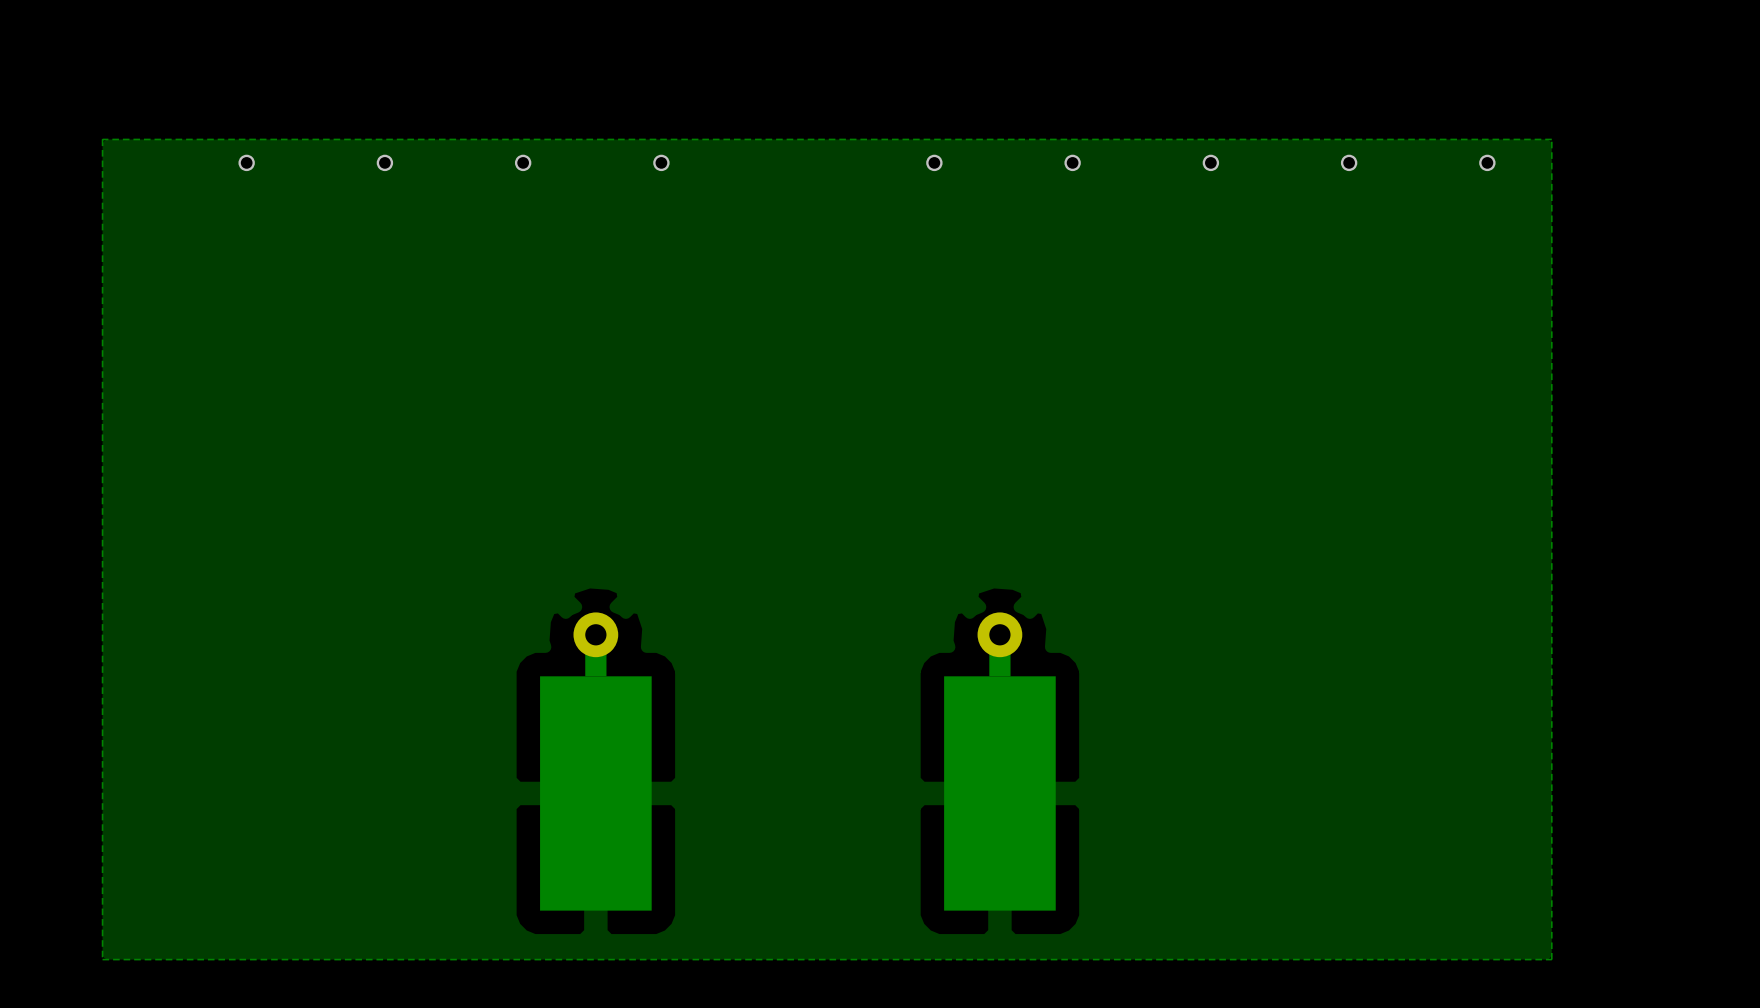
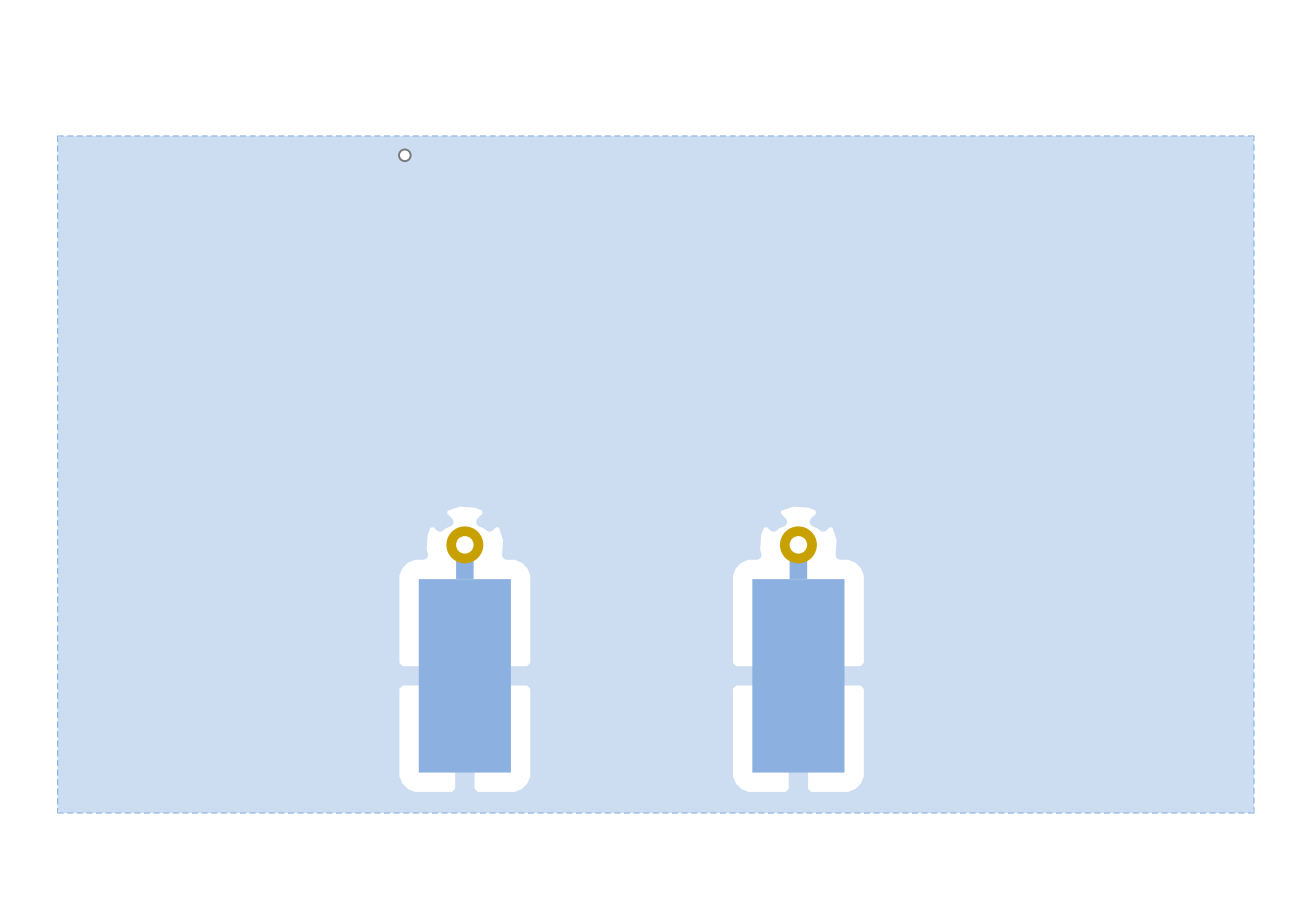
via: (246, 162) -> none
via: (384, 162) -> none
via: (661, 162) -> none
via: (934, 162) -> none
via: (1072, 162) -> none
via: (1210, 162) -> none
via: (1349, 162) -> none
via: (1487, 162) -> none

